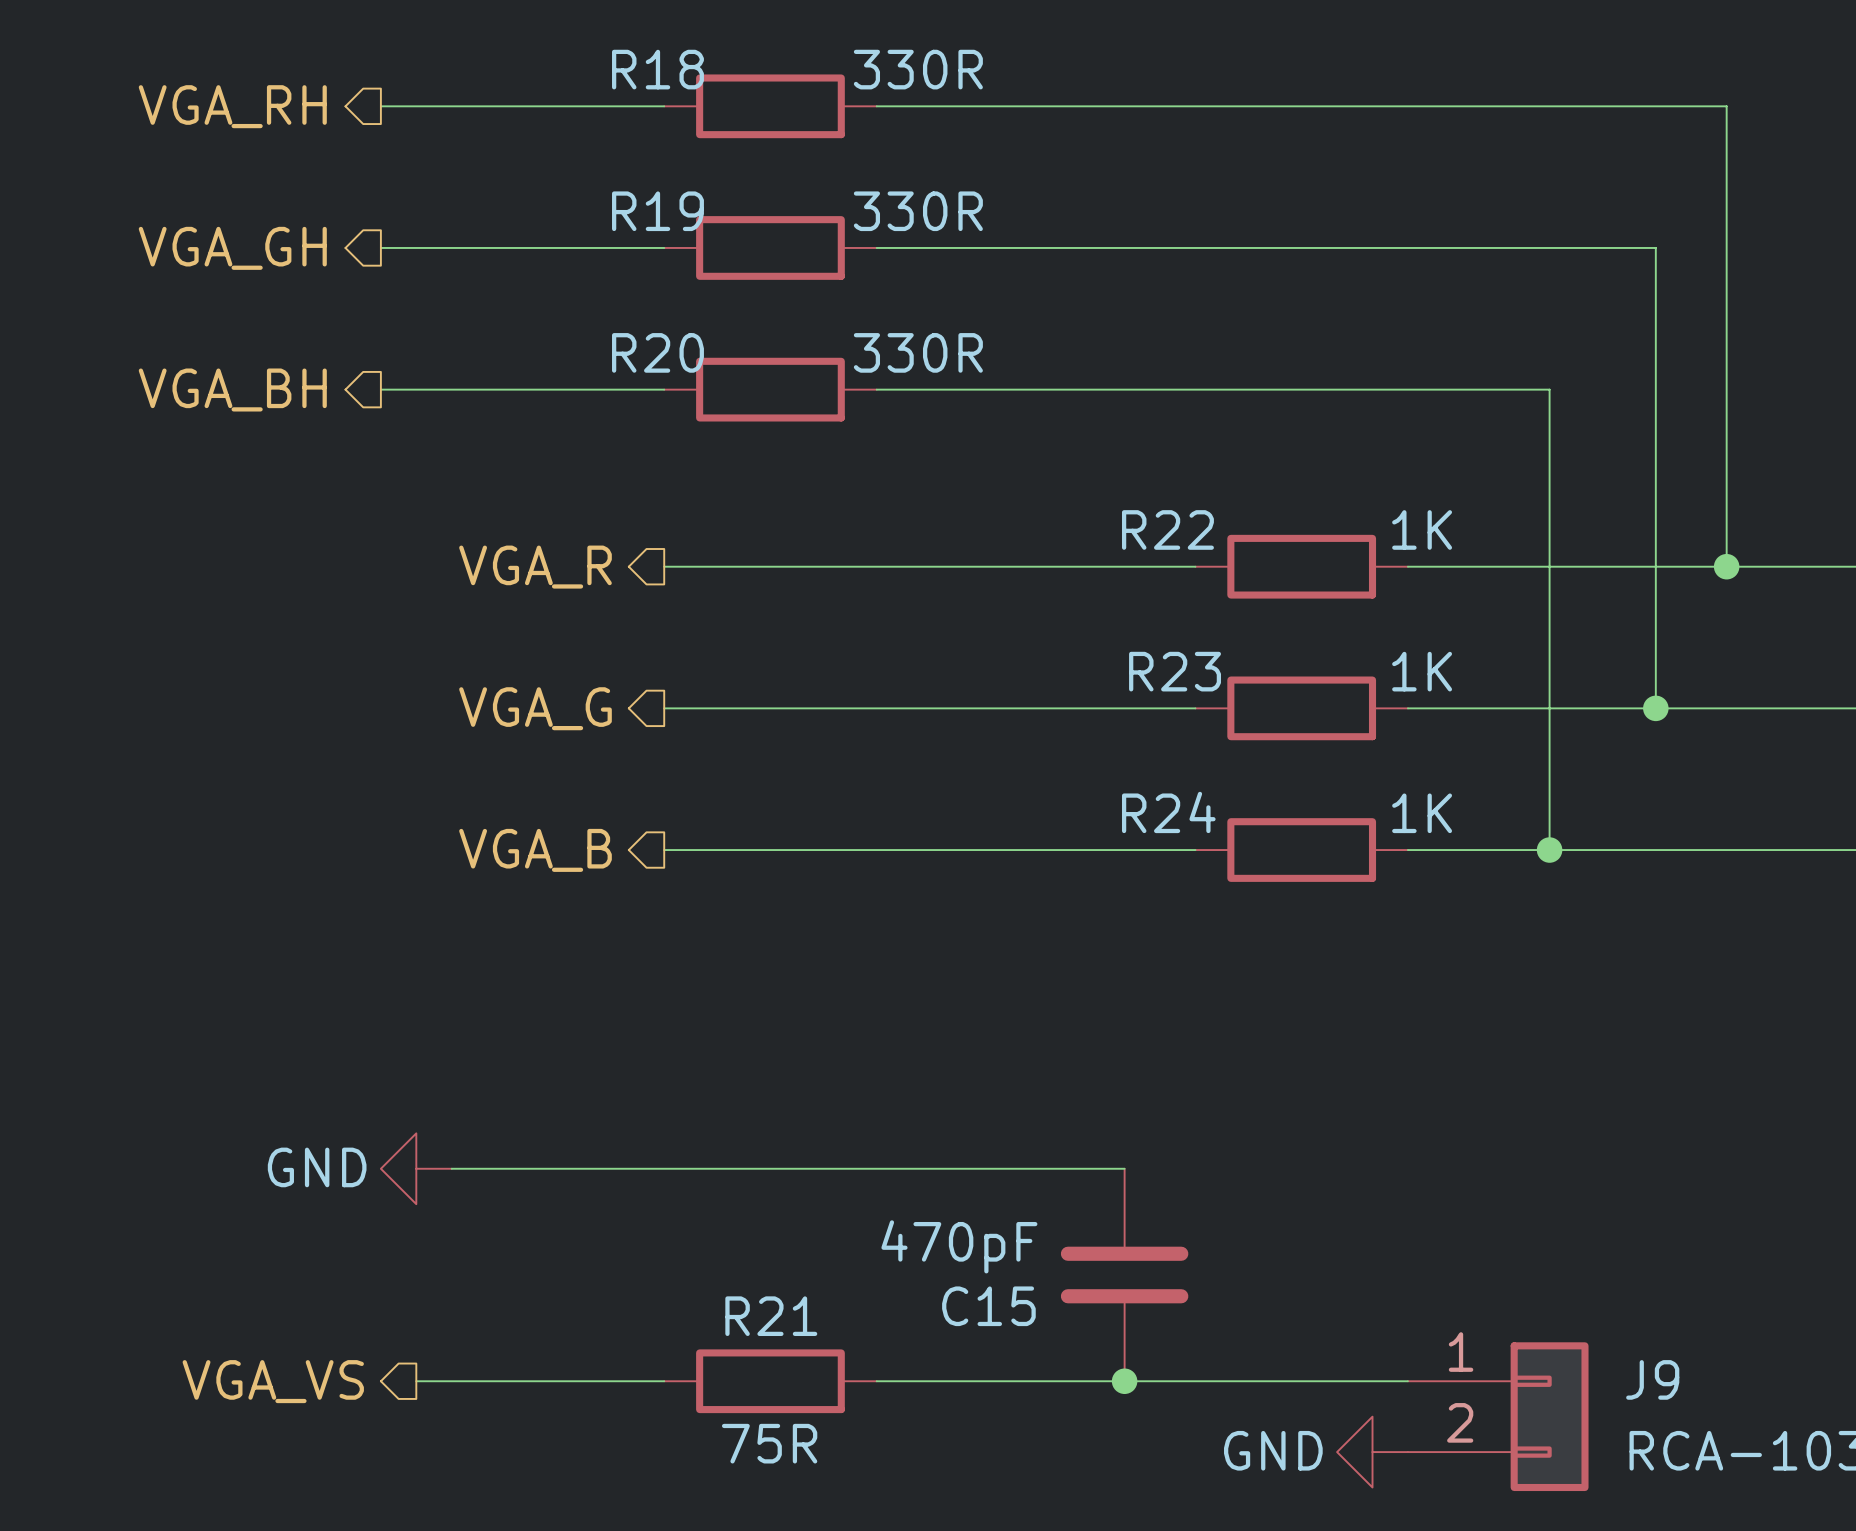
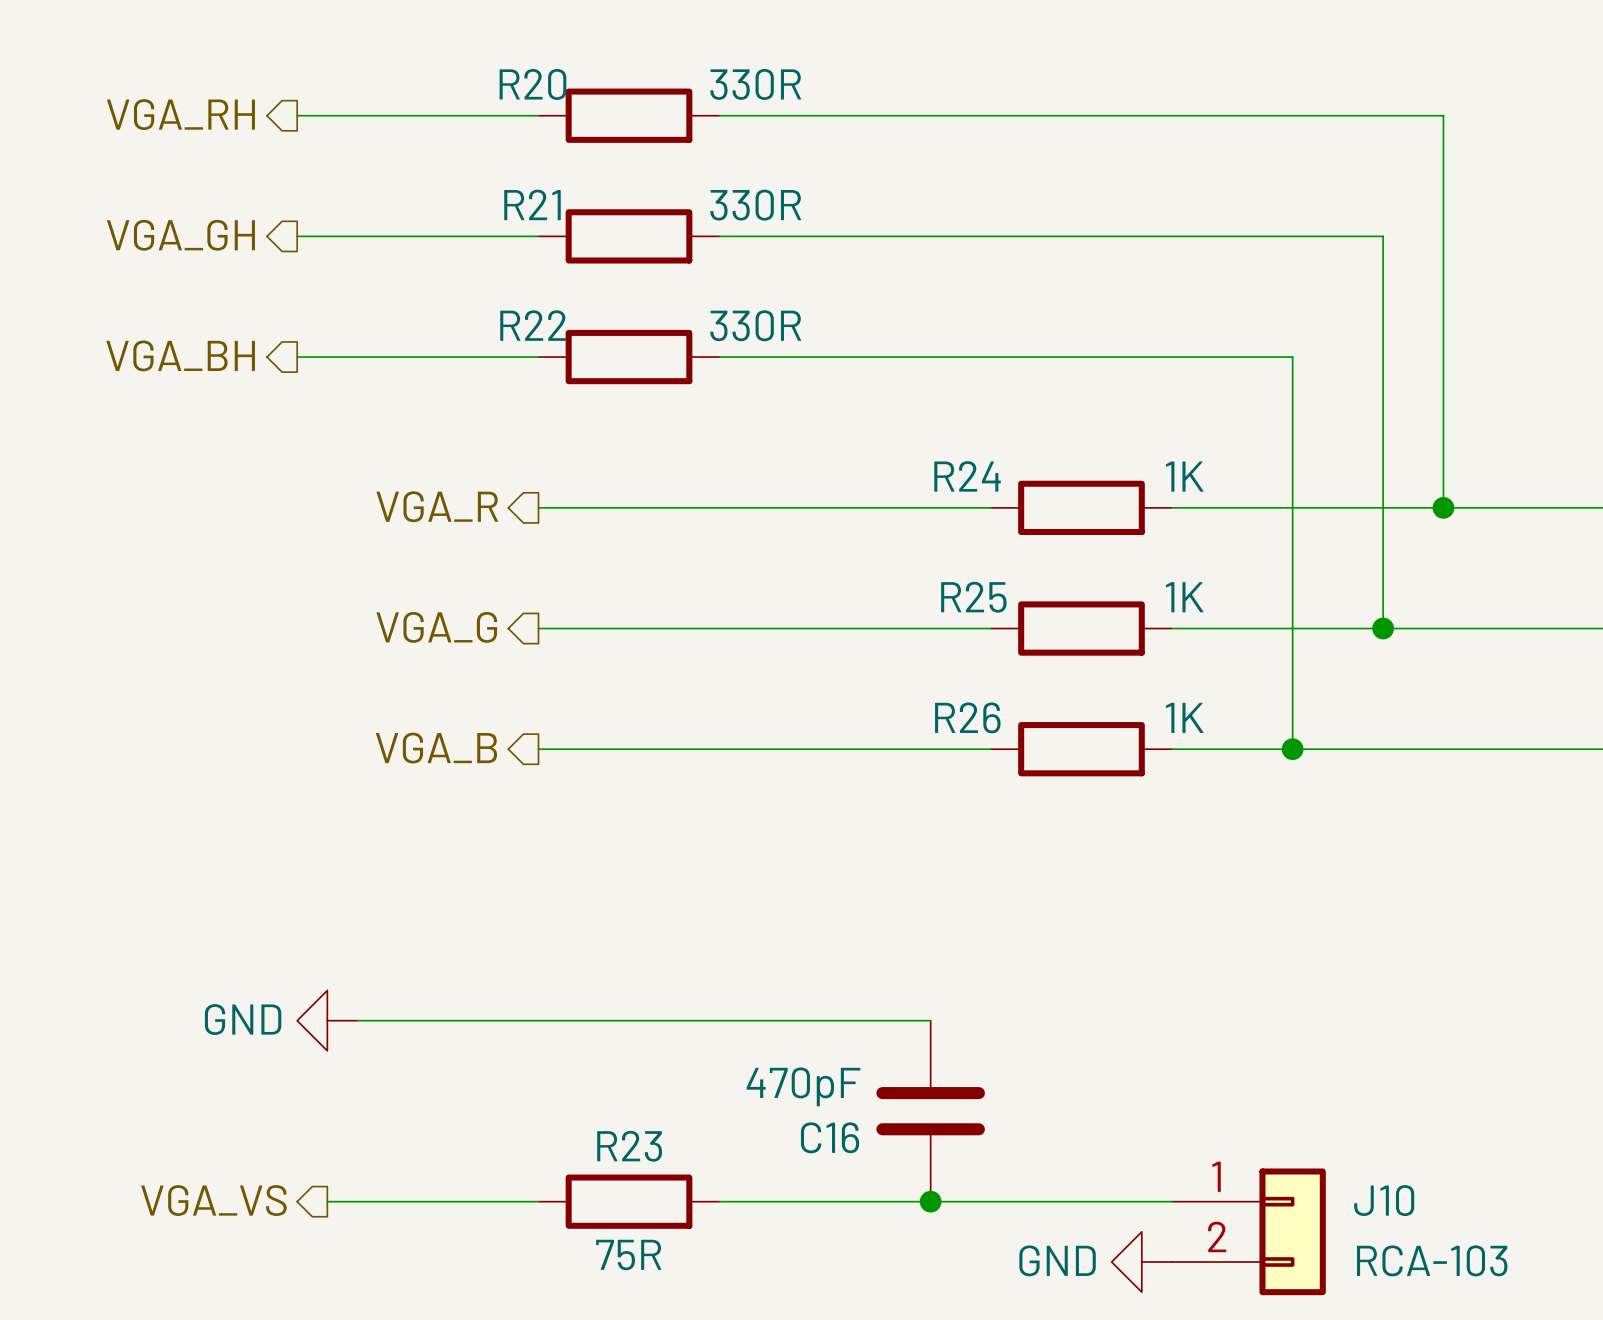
R18 name: R18 (657, 69) -> R20 (532, 84)
R19 name: R19 (657, 211) -> R21 (532, 204)
R20 name: R20 (657, 352) -> R22 (533, 325)
R22 name: R22 (1167, 529) -> R24 (967, 476)
R23 name: R23 (1175, 671) -> R25 (973, 597)
R24 name: R24 (1168, 812) -> R26 (967, 717)
C15 name: C15 (988, 1306) -> C16 (830, 1137)
R21 name: R21 (771, 1316) -> R23 (629, 1146)
J9 name: J9 (1652, 1379) -> J10 (1384, 1200)

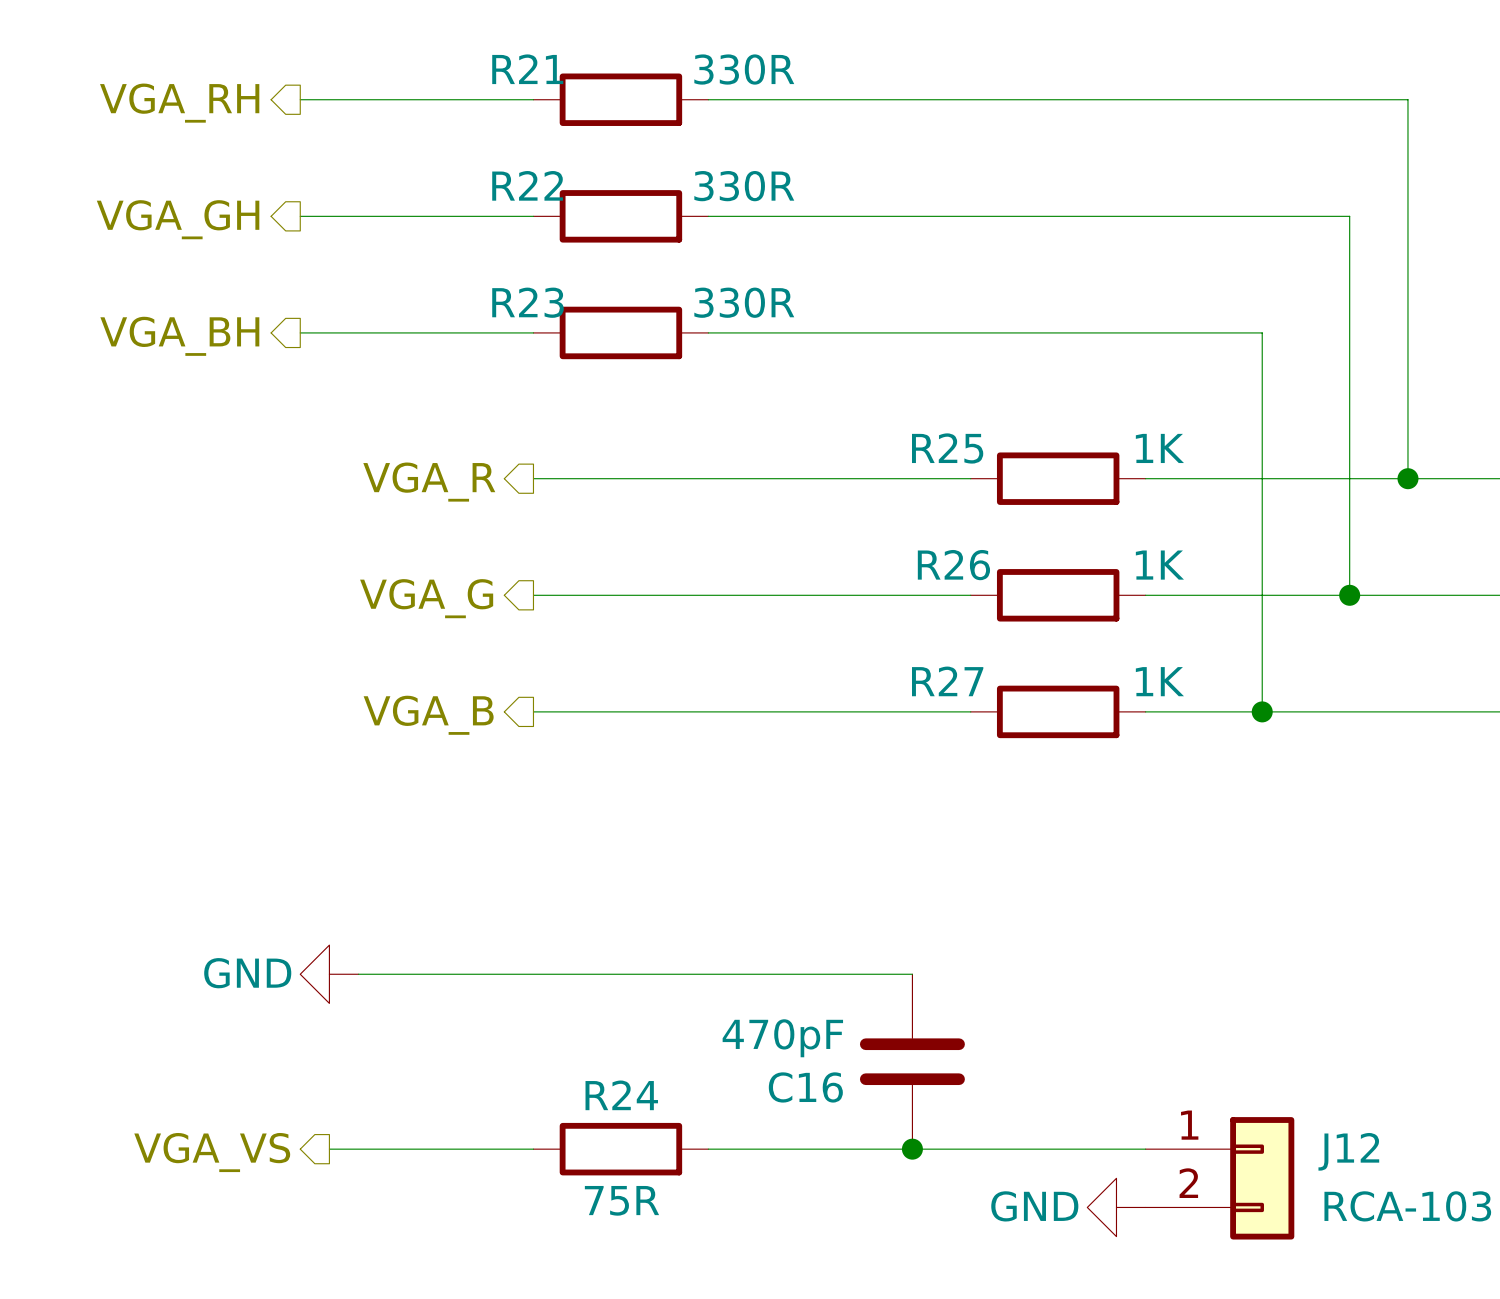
R20 name: R20 (532, 84) -> R21 (527, 69)
R21 name: R21 (532, 204) -> R22 (527, 185)
R22 name: R22 (533, 325) -> R23 (528, 302)
R24 name: R24 (967, 476) -> R25 (947, 448)
R25 name: R25 (973, 597) -> R26 (953, 565)
R26 name: R26 (967, 717) -> R27 (947, 681)
R23 name: R23 (629, 1146) -> R24 (621, 1095)
J10 name: J10 (1384, 1200) -> J12 (1348, 1151)

